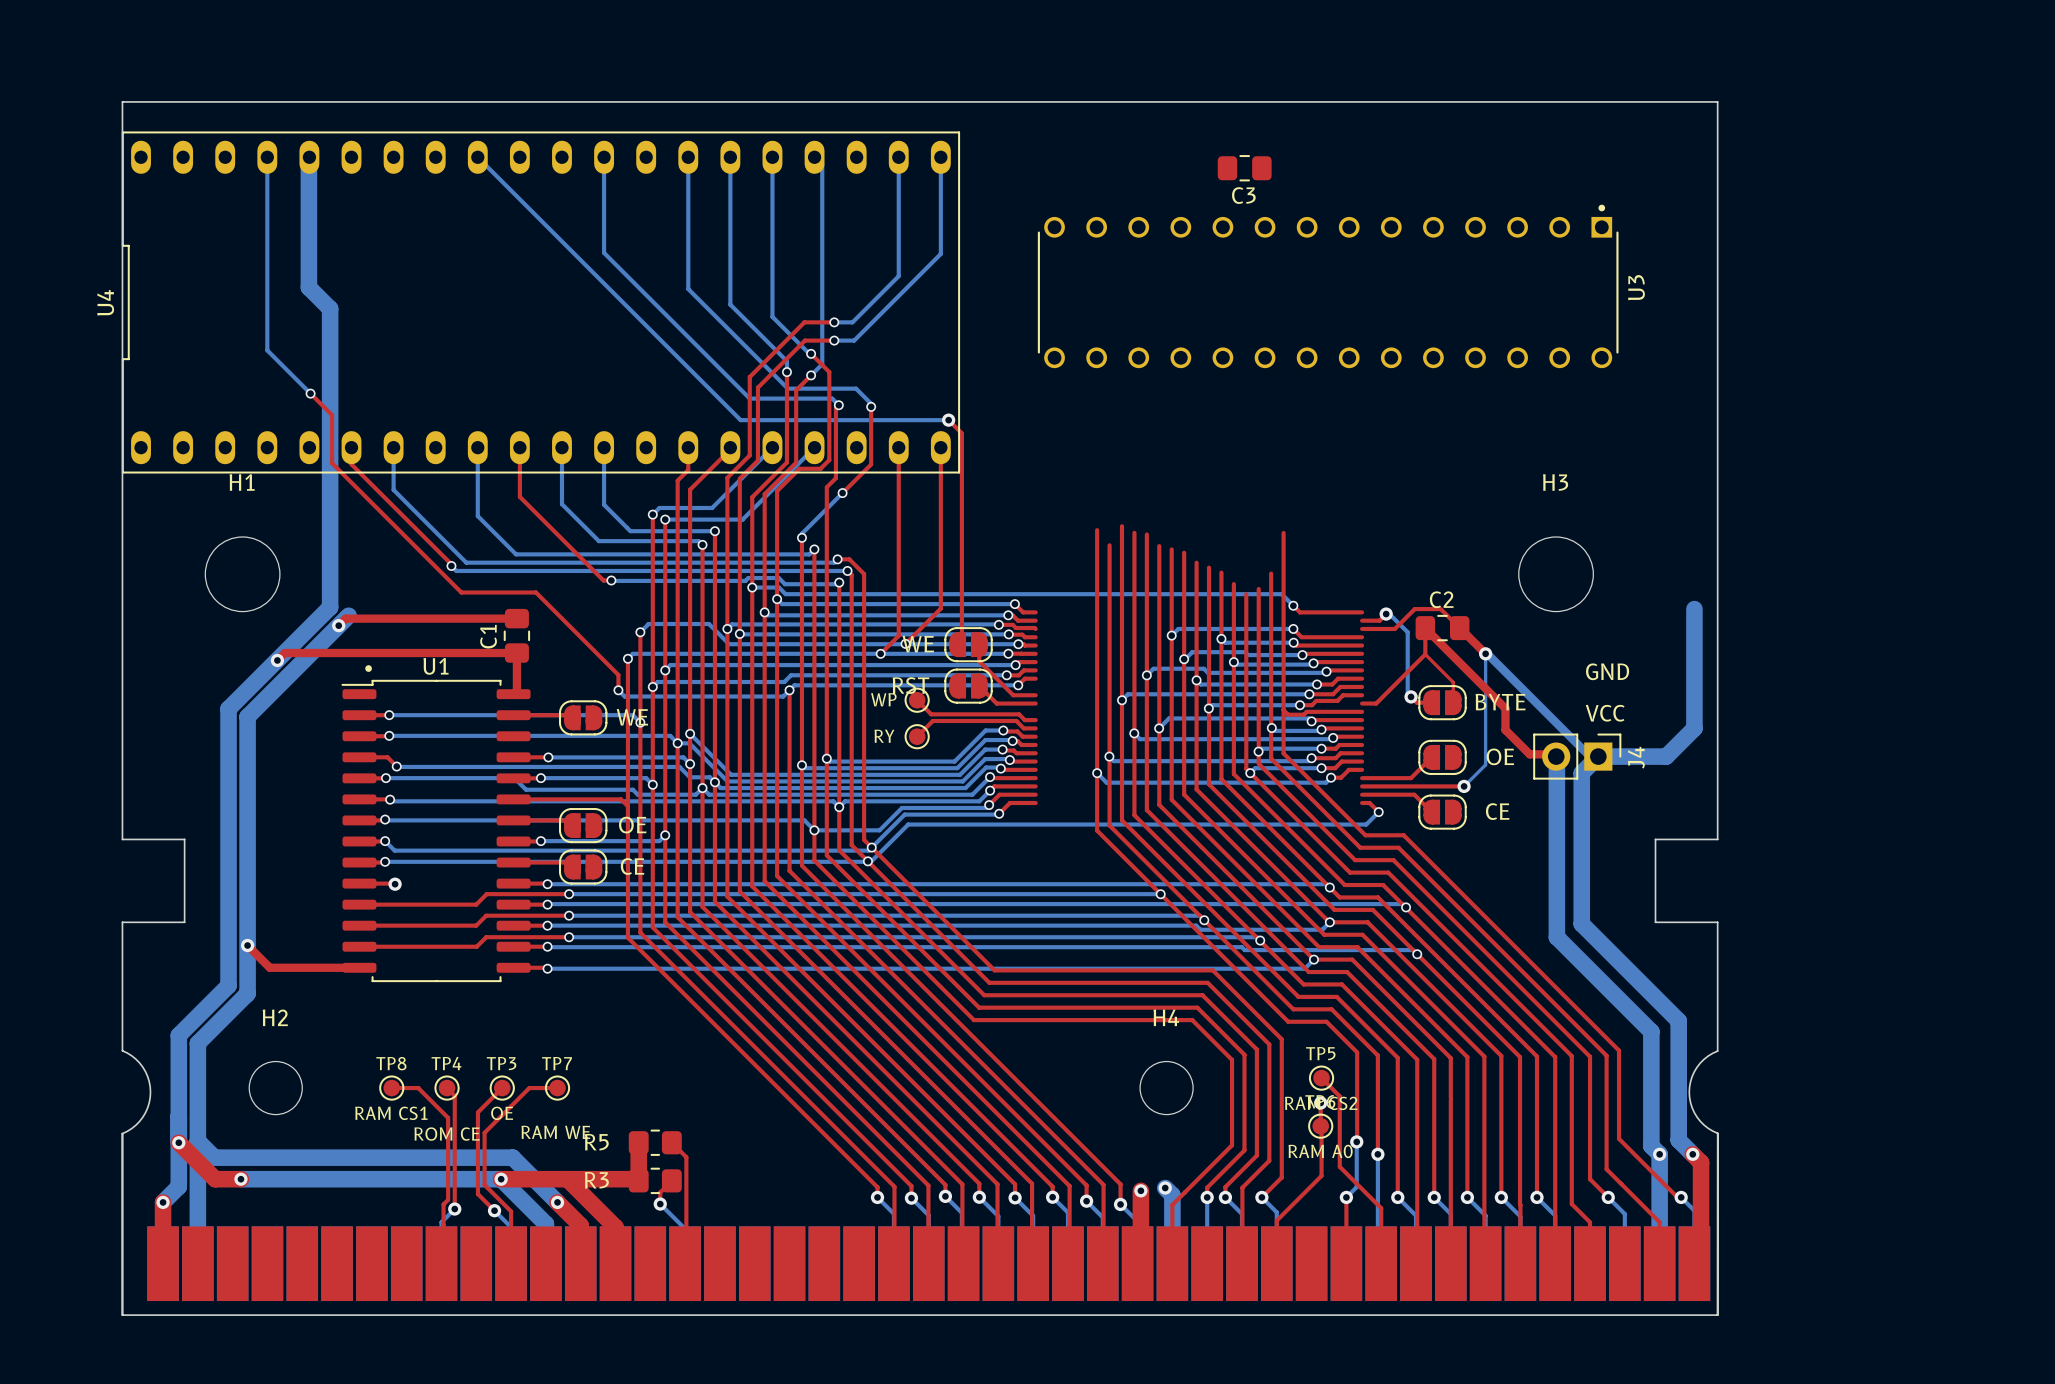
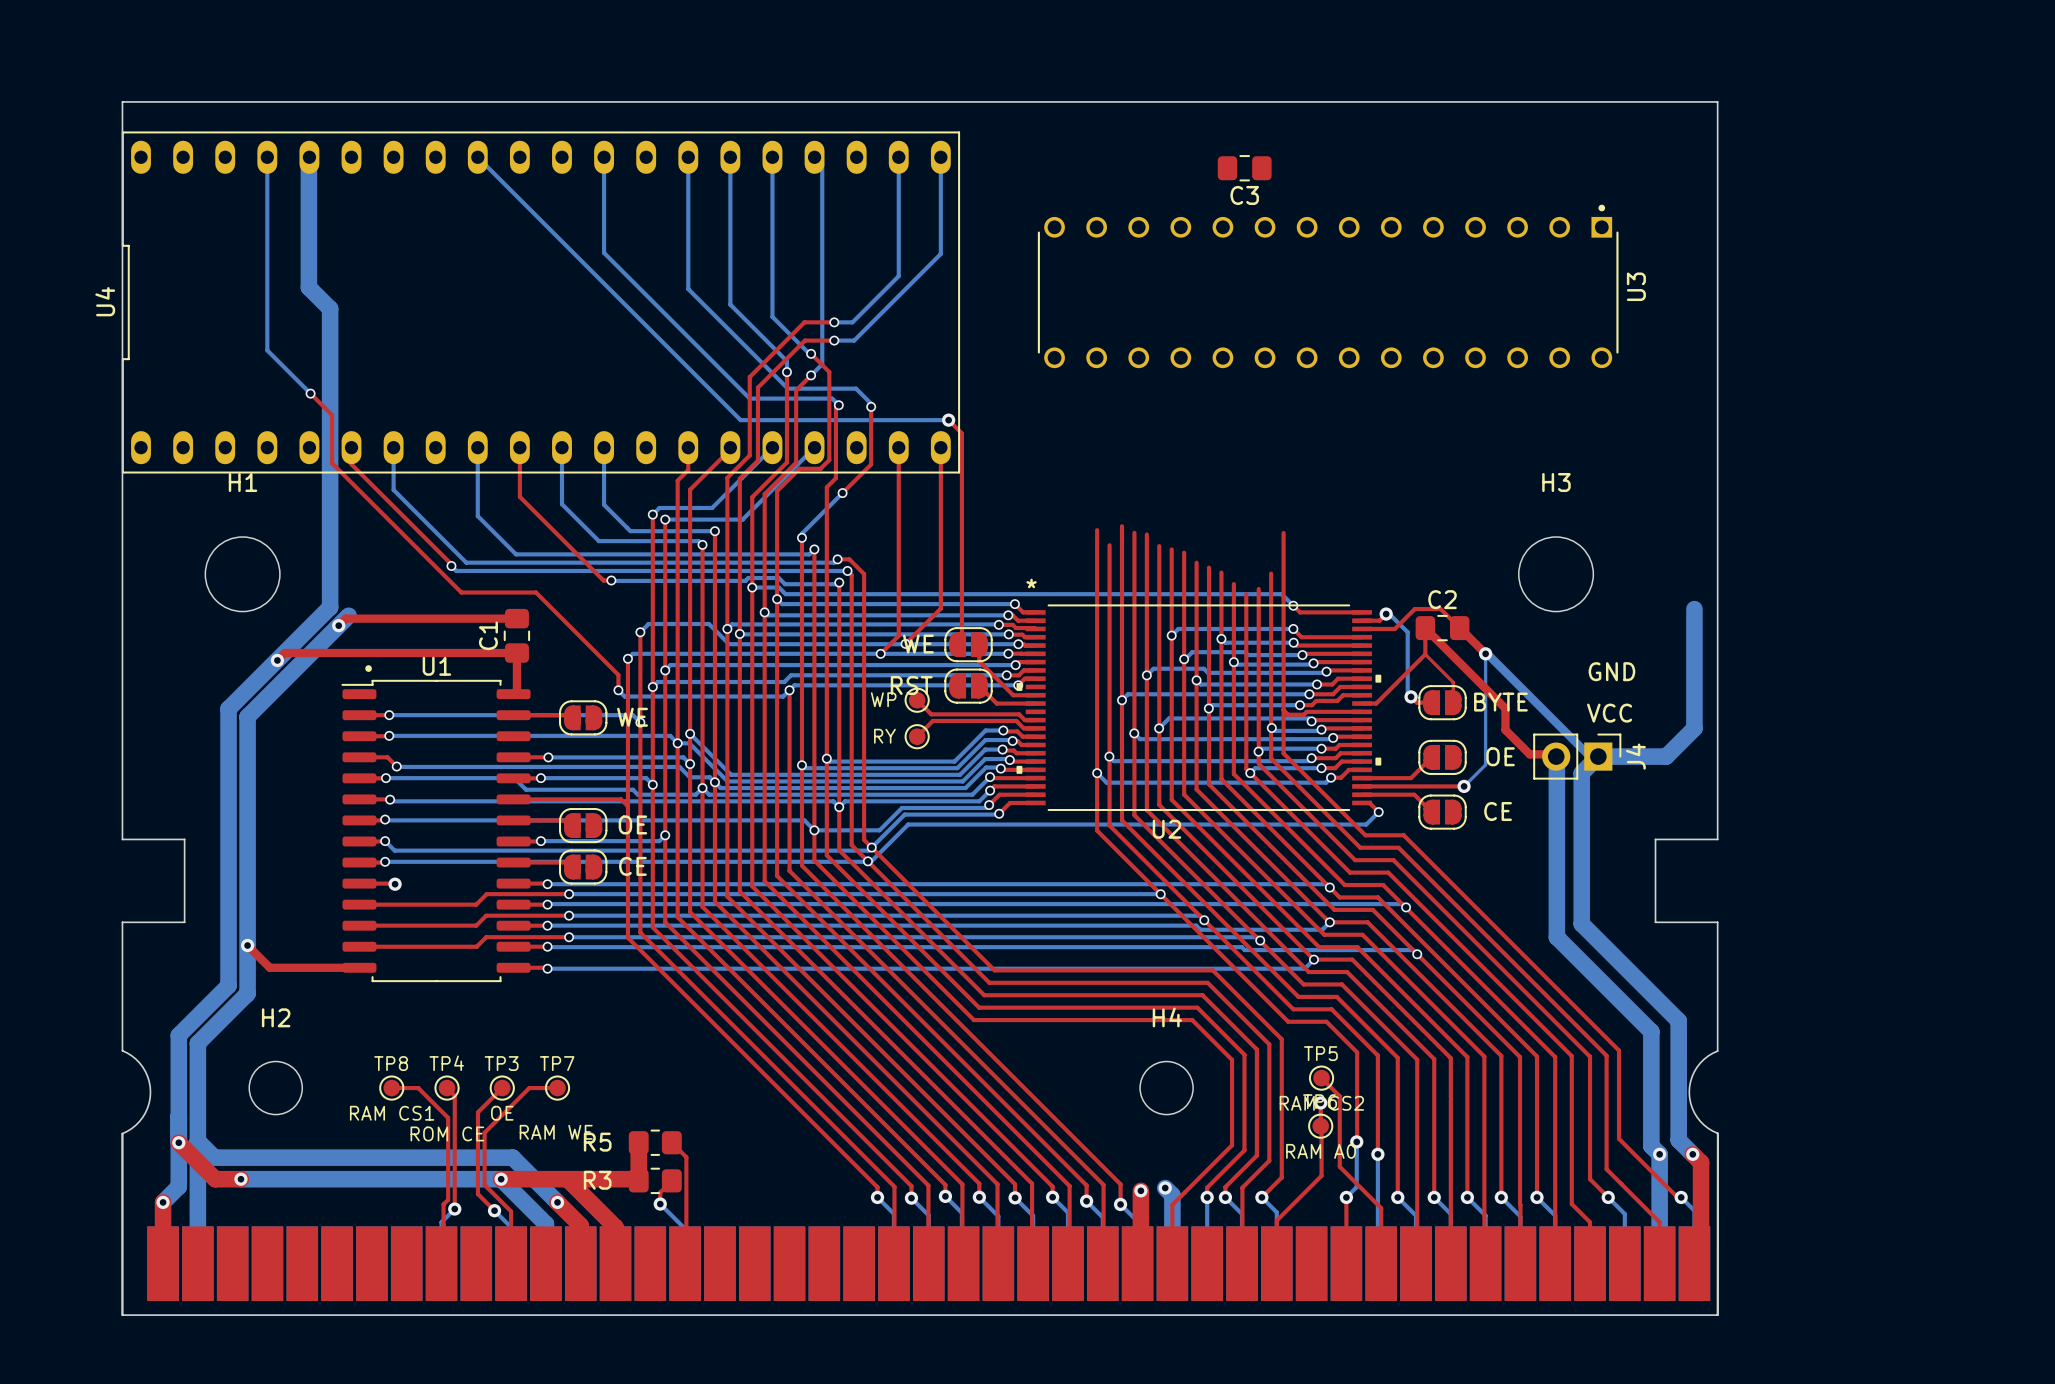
U2: none -> (1198, 707)

